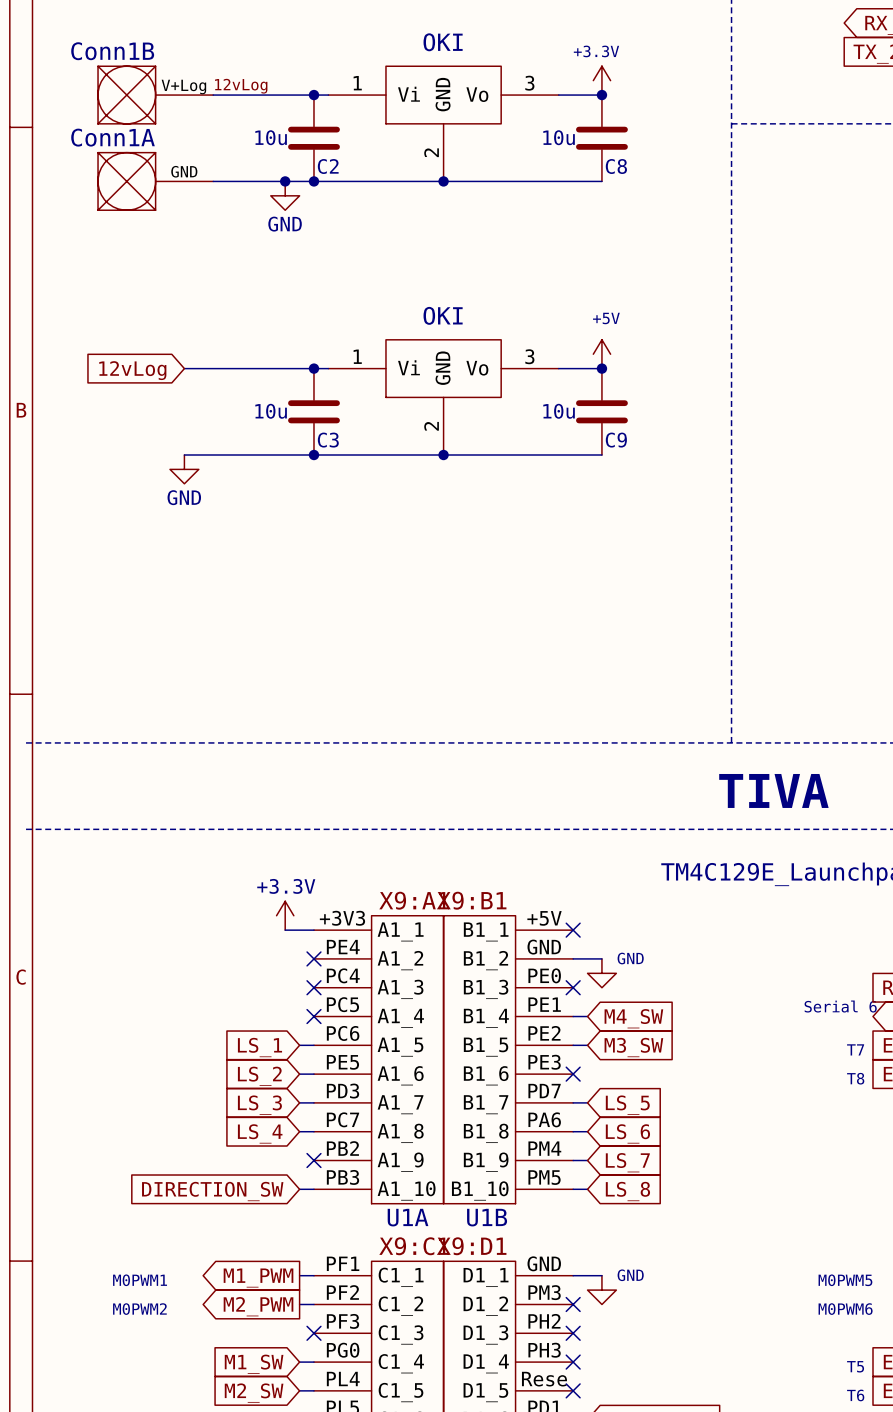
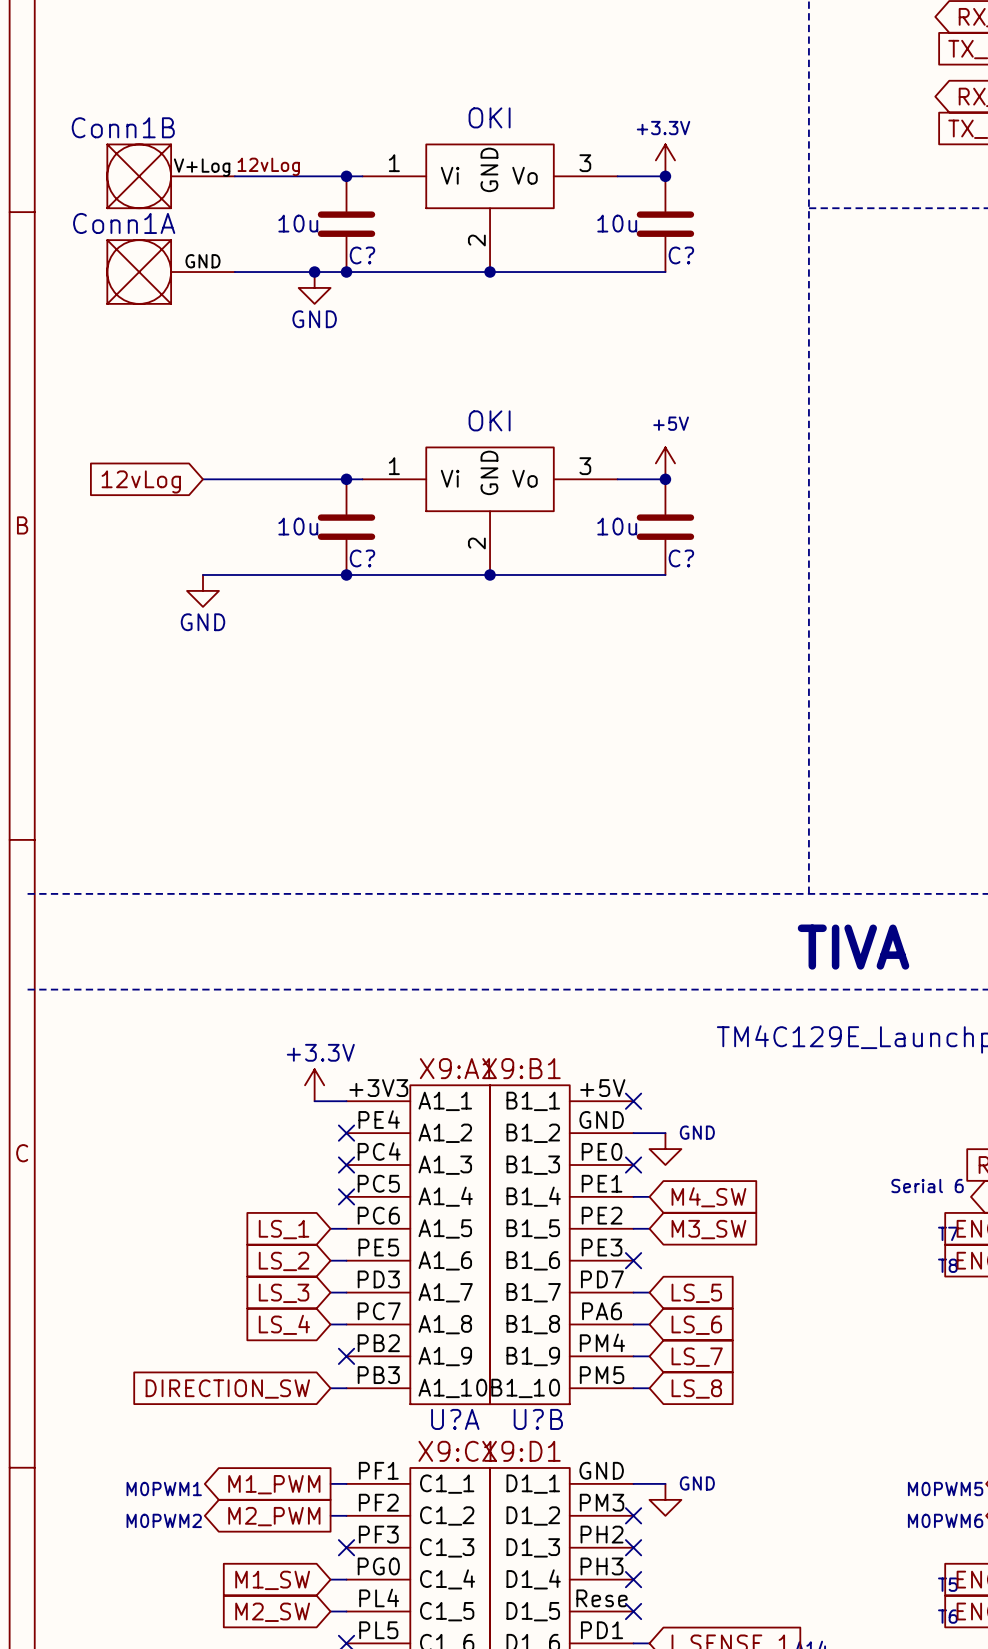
C2 name: C2 (328, 166) -> C? (362, 255)
C8 name: C8 (616, 166) -> C? (681, 255)
C3 name: C3 (328, 440) -> C? (362, 558)
C9 name: C9 (616, 440) -> C? (681, 558)
U1A name: U1A (408, 1217) -> U?A (455, 1419)
U1B name: U1B (487, 1217) -> U?B (538, 1419)

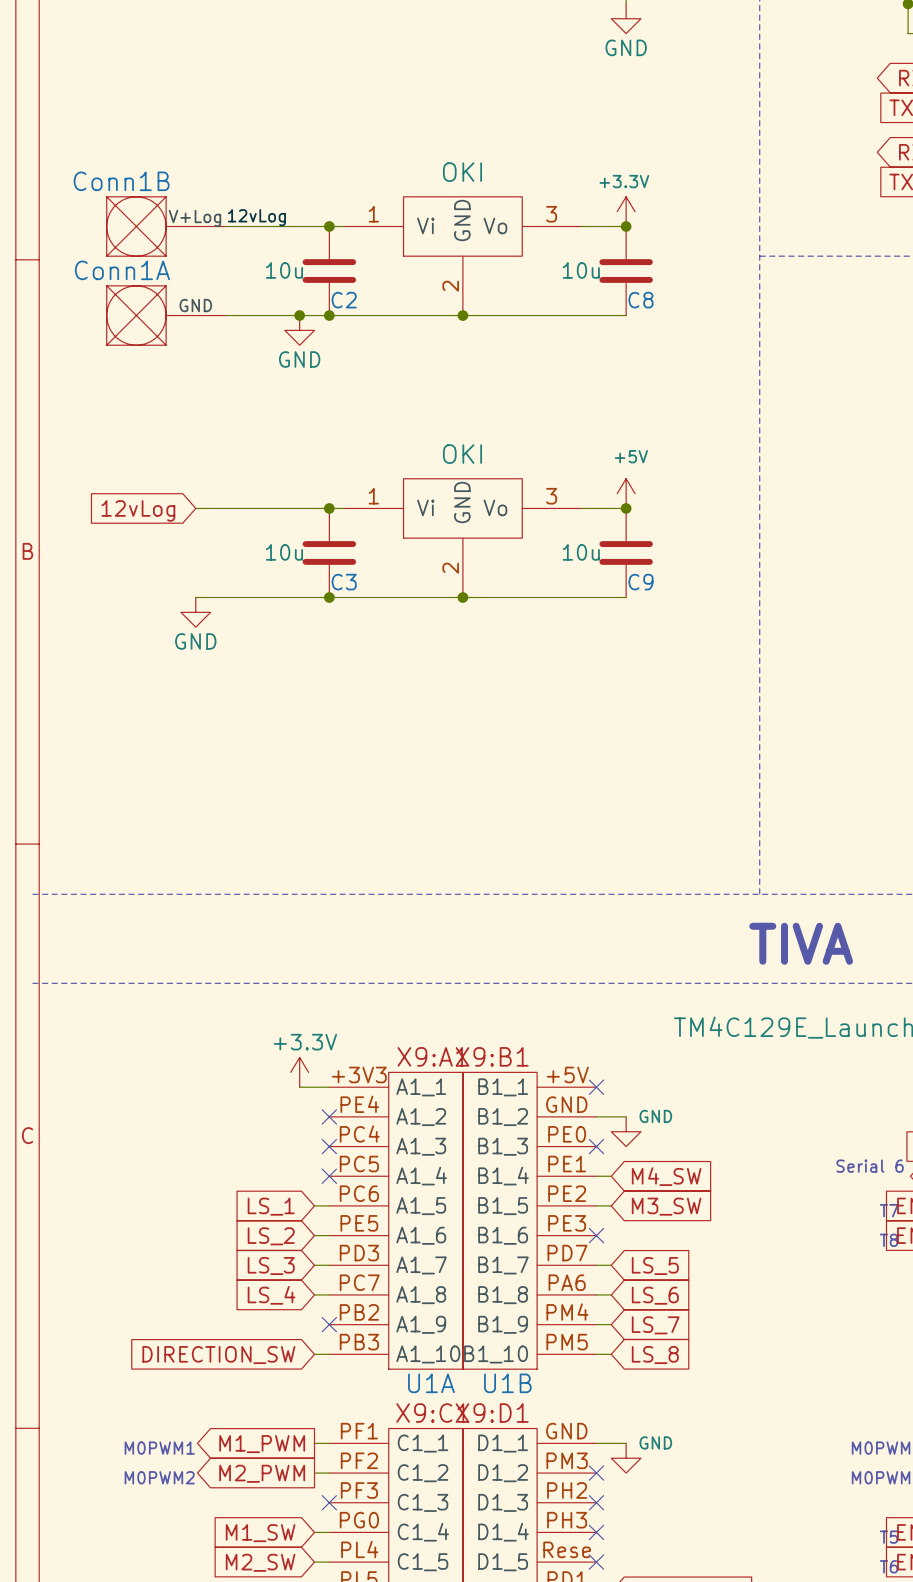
C? name: C? (362, 255) -> C2 (344, 300)
C? name: C? (681, 255) -> C8 (640, 300)
C? name: C? (362, 558) -> C3 (344, 582)
C? name: C? (681, 558) -> C9 (640, 582)
U?A name: U?A (455, 1419) -> U1A (431, 1383)
U?B name: U?B (538, 1419) -> U1B (507, 1383)

